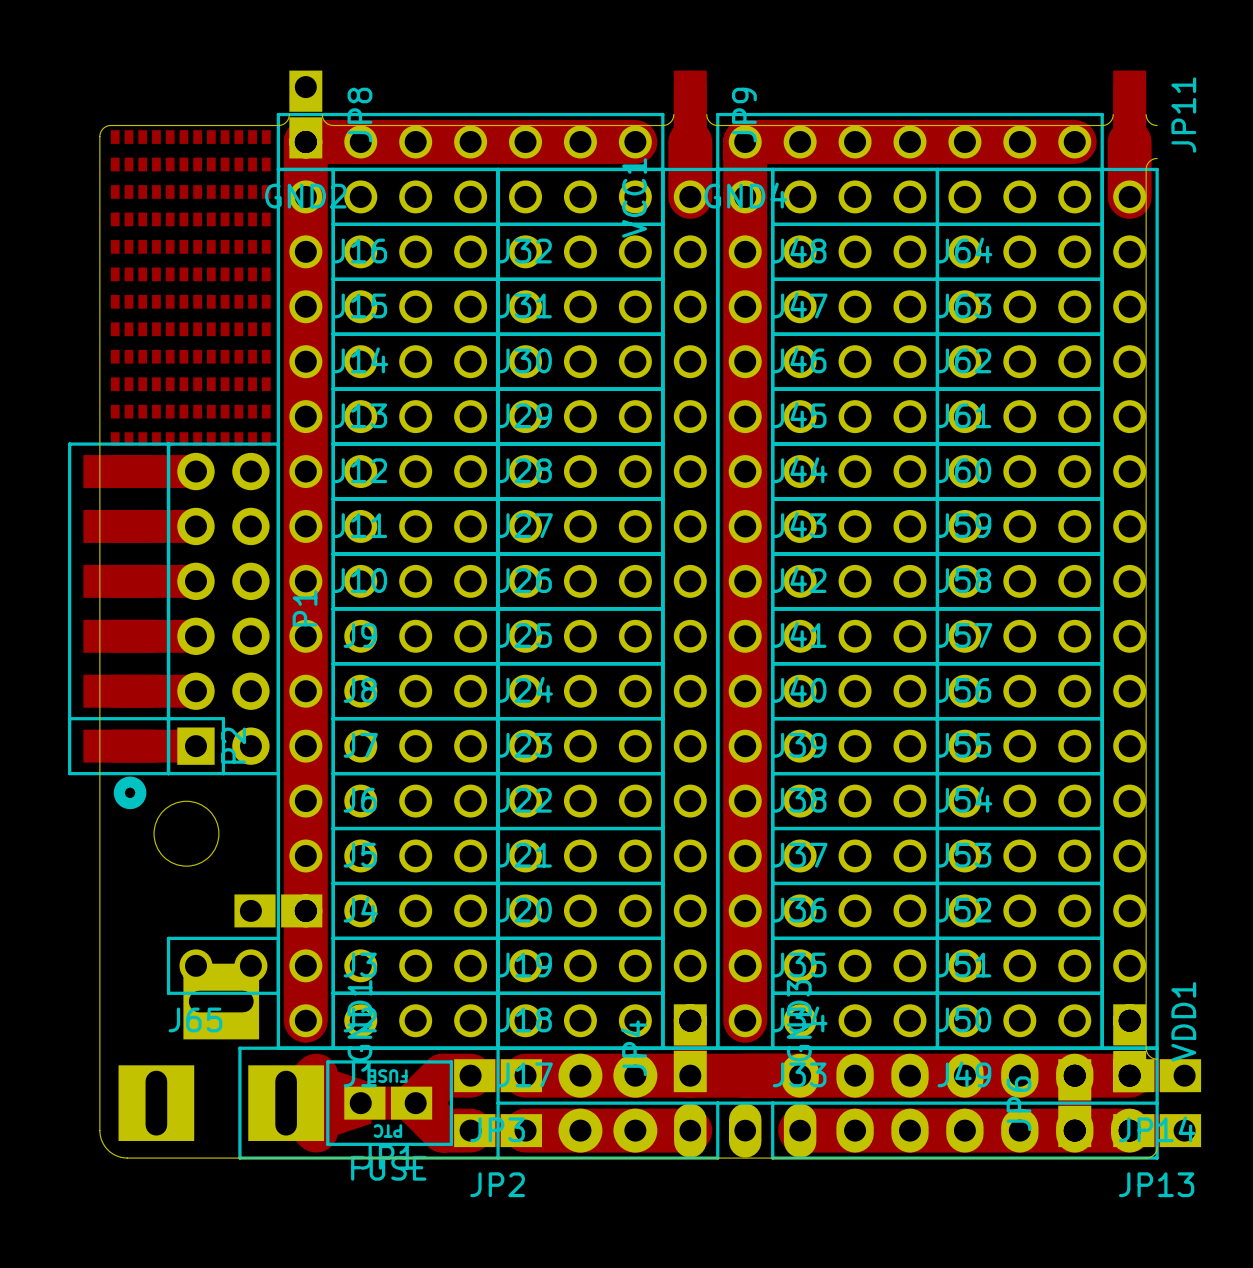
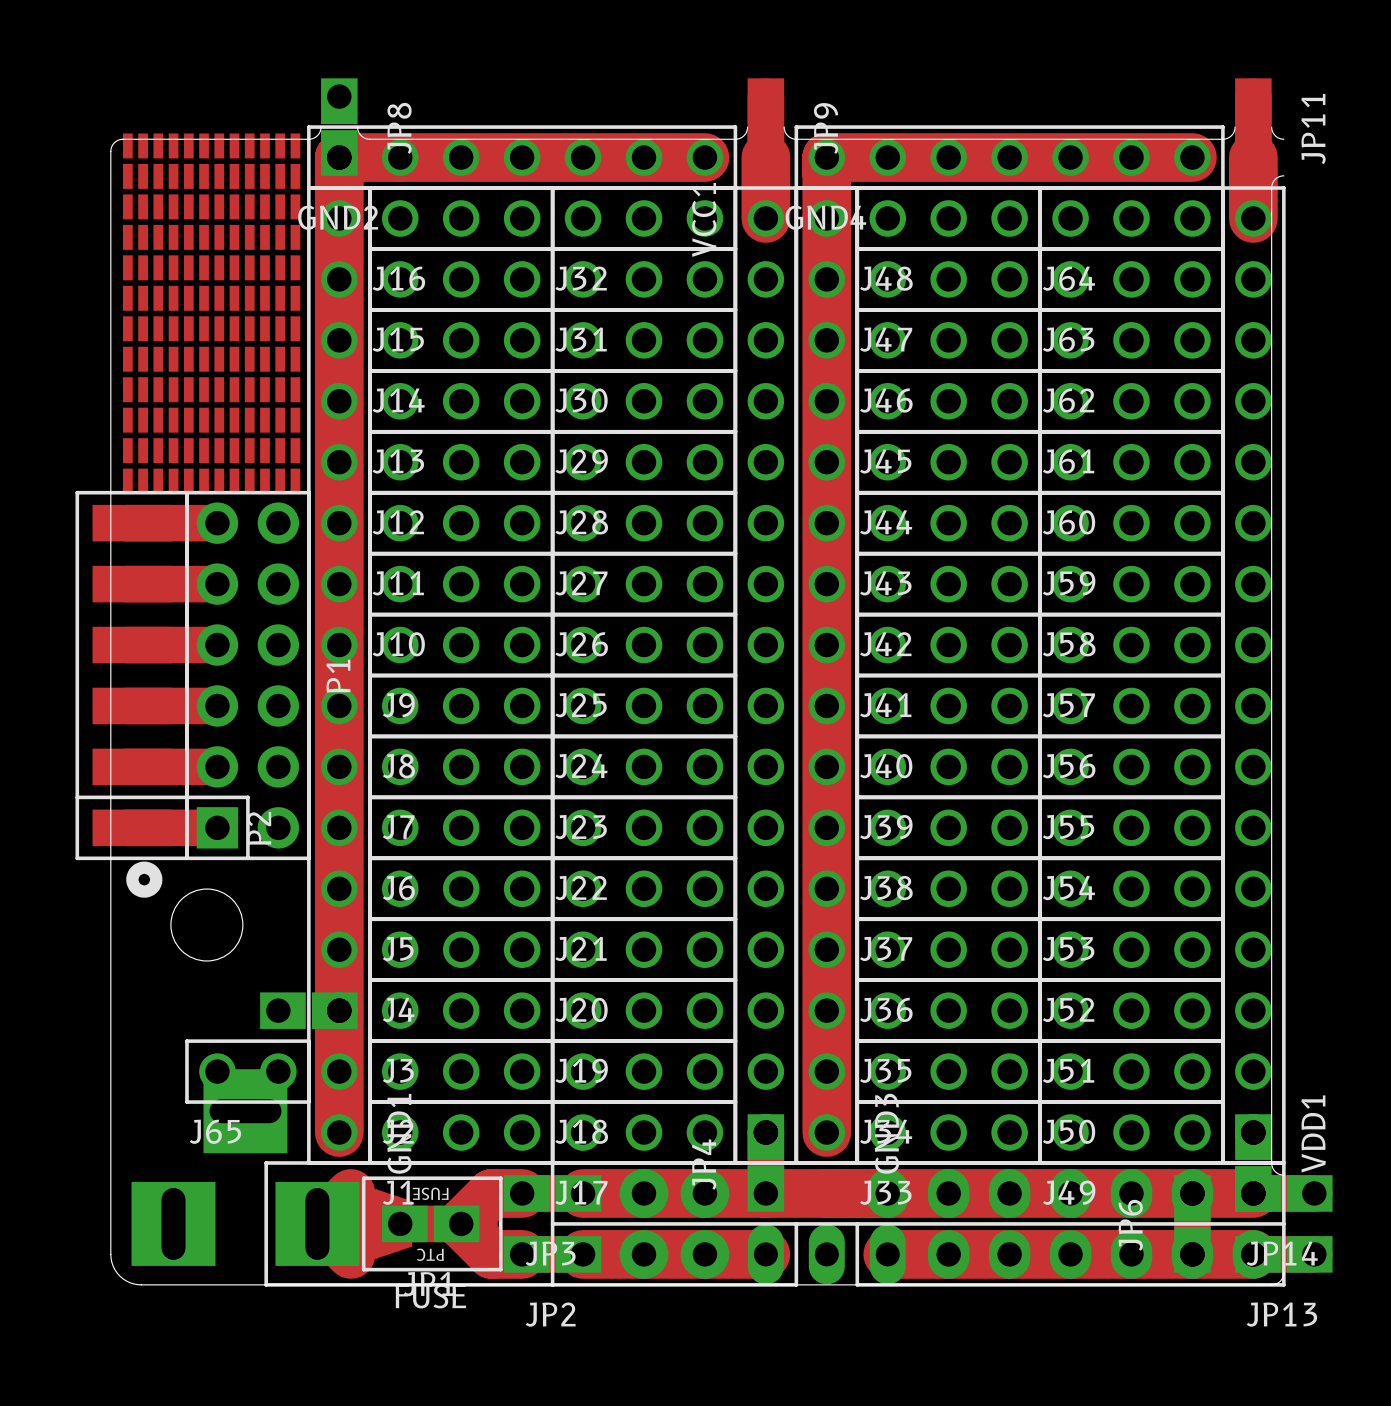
part footprint: [110, 130, 271, 227] -> [122, 133, 301, 250]
part footprint: [110, 240, 271, 337] -> [122, 255, 301, 372]
part footprint: [110, 349, 271, 446] -> [122, 377, 301, 494]

